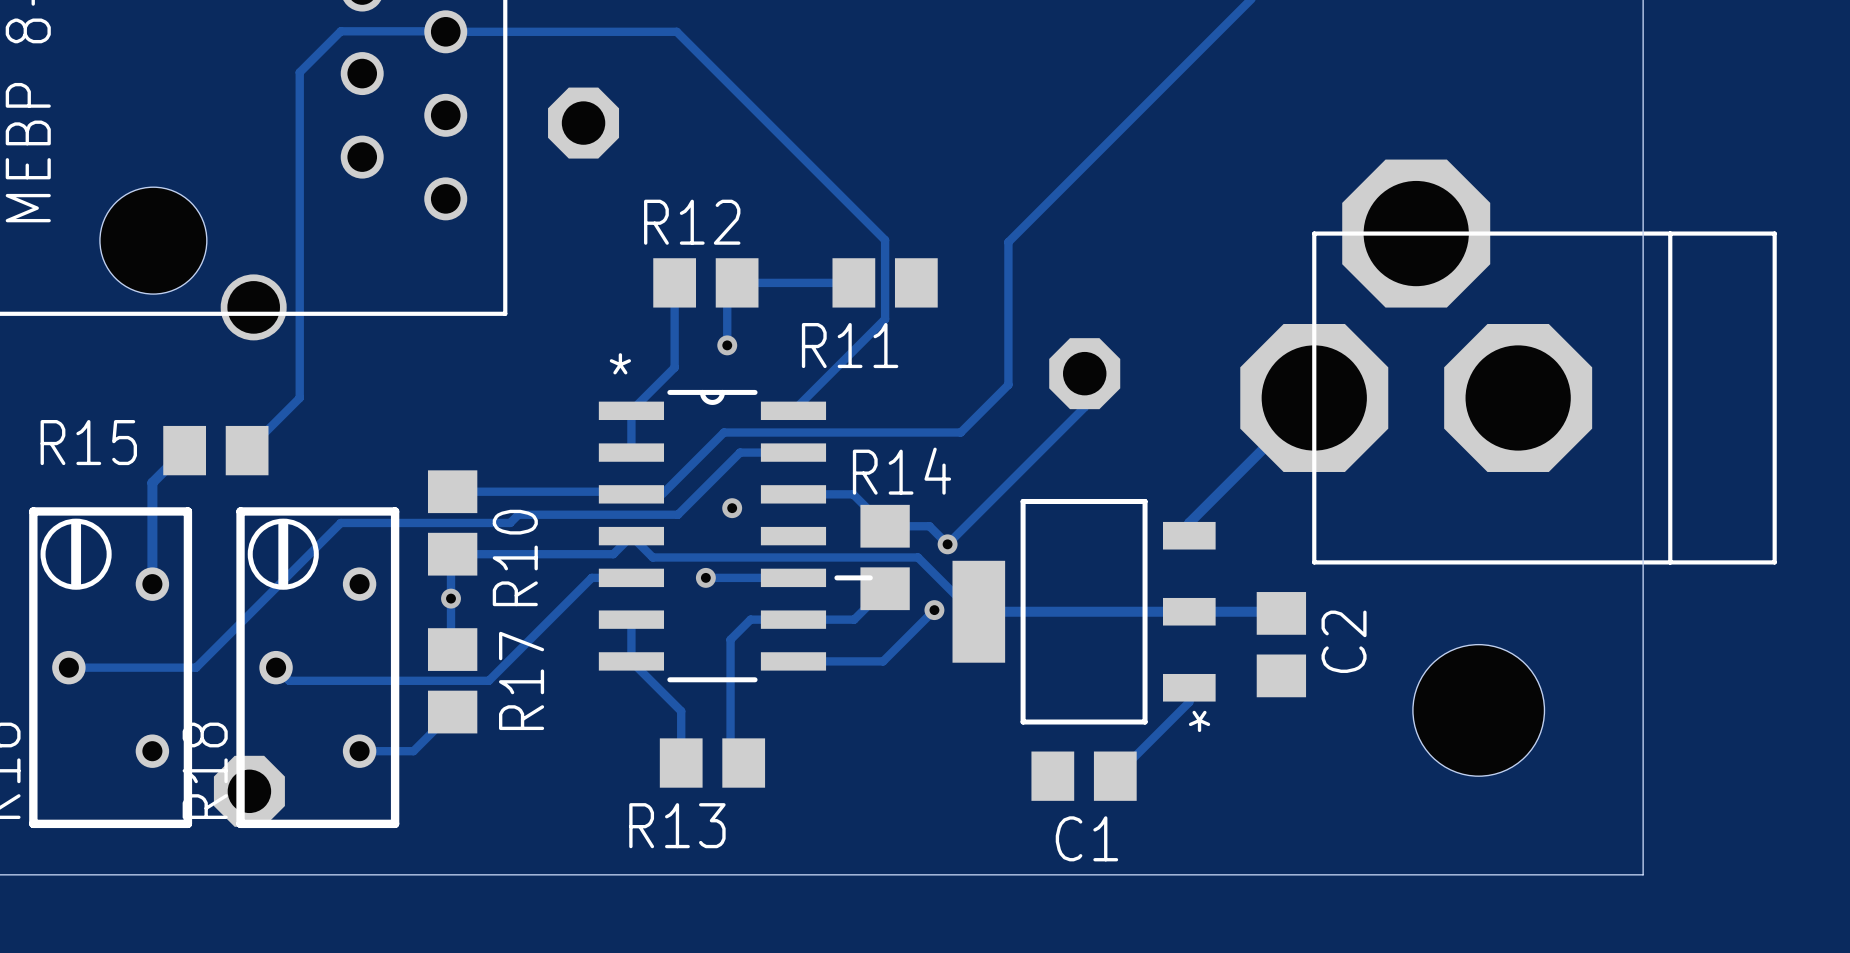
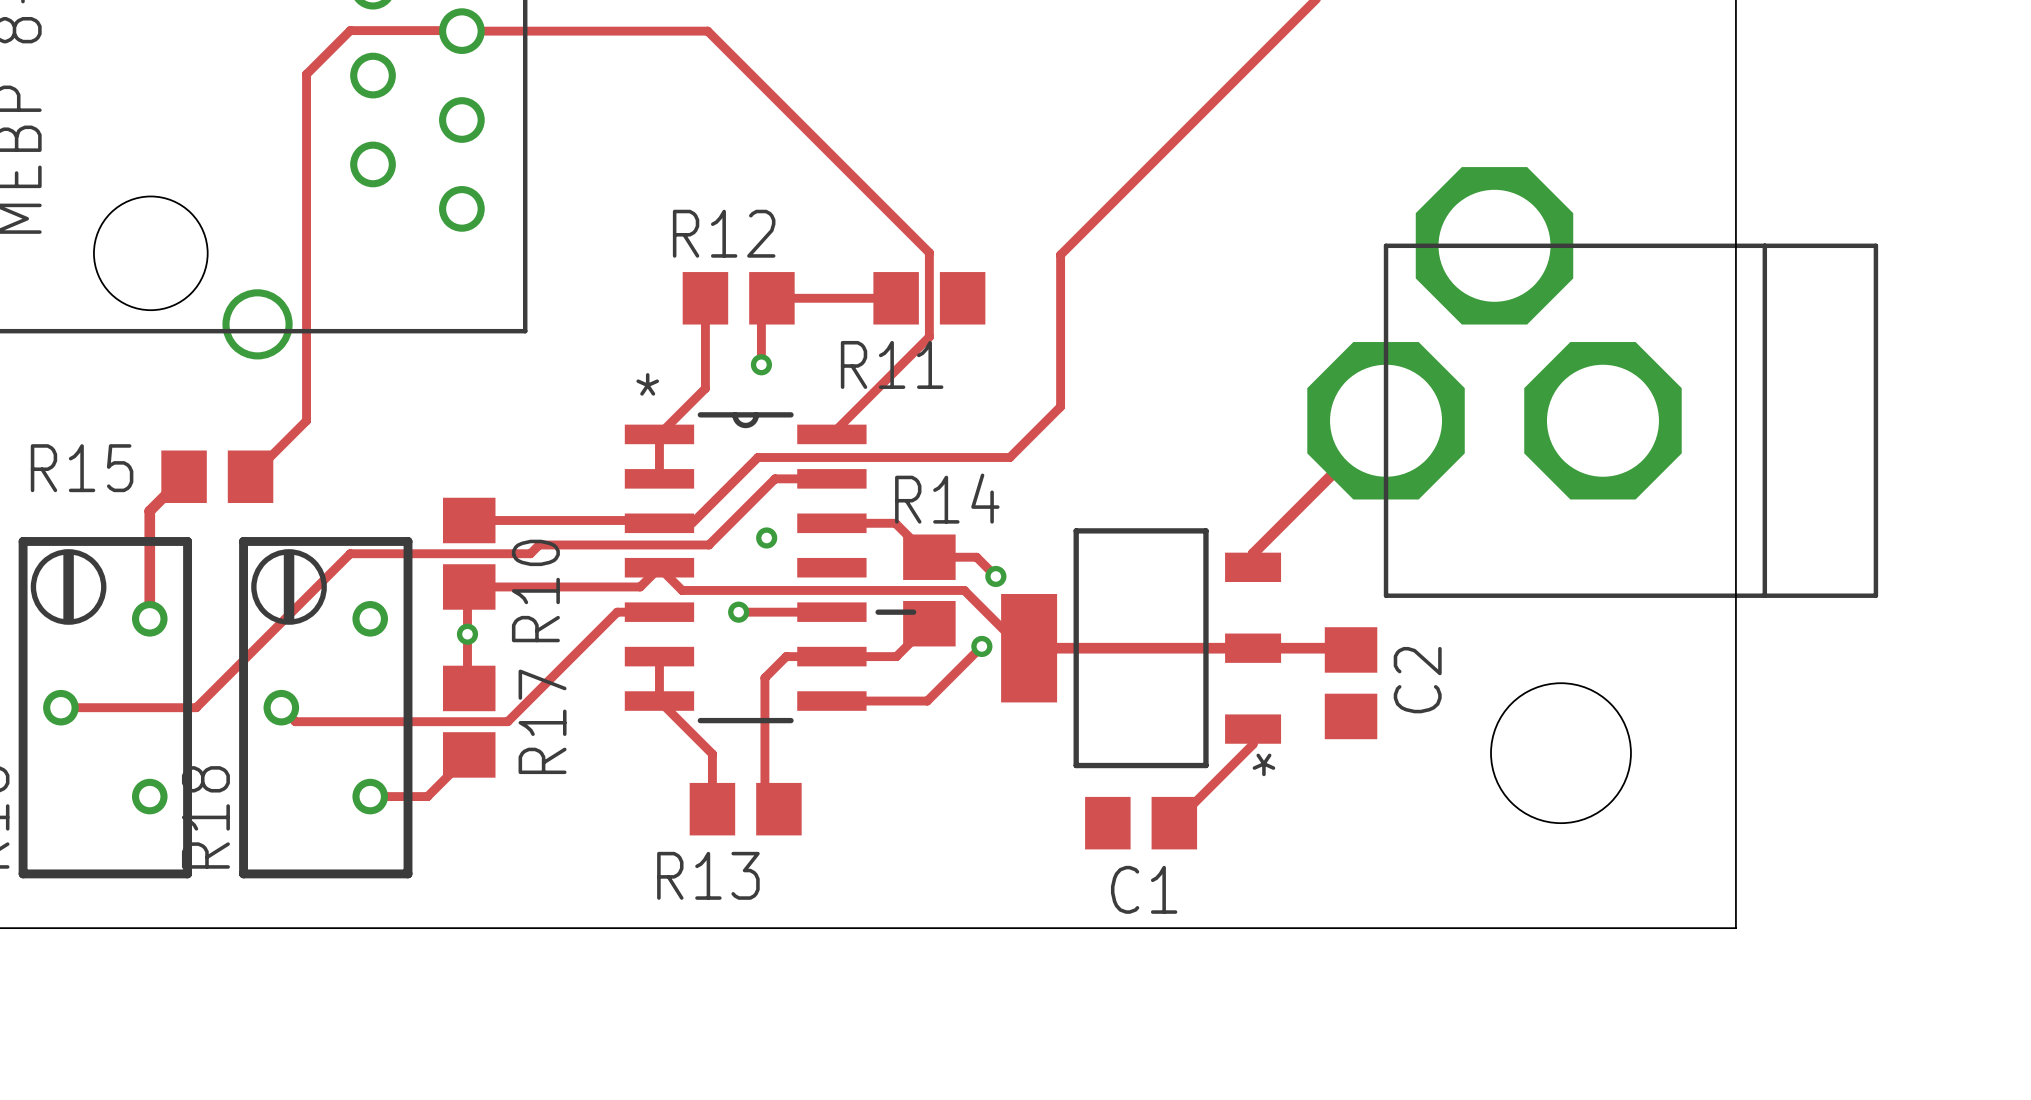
part: (583, 123) -> none
track: (1084, 373) (1084, 407) (947, 544) -> none
part: (1084, 373) -> none
part: (249, 791) -> none

